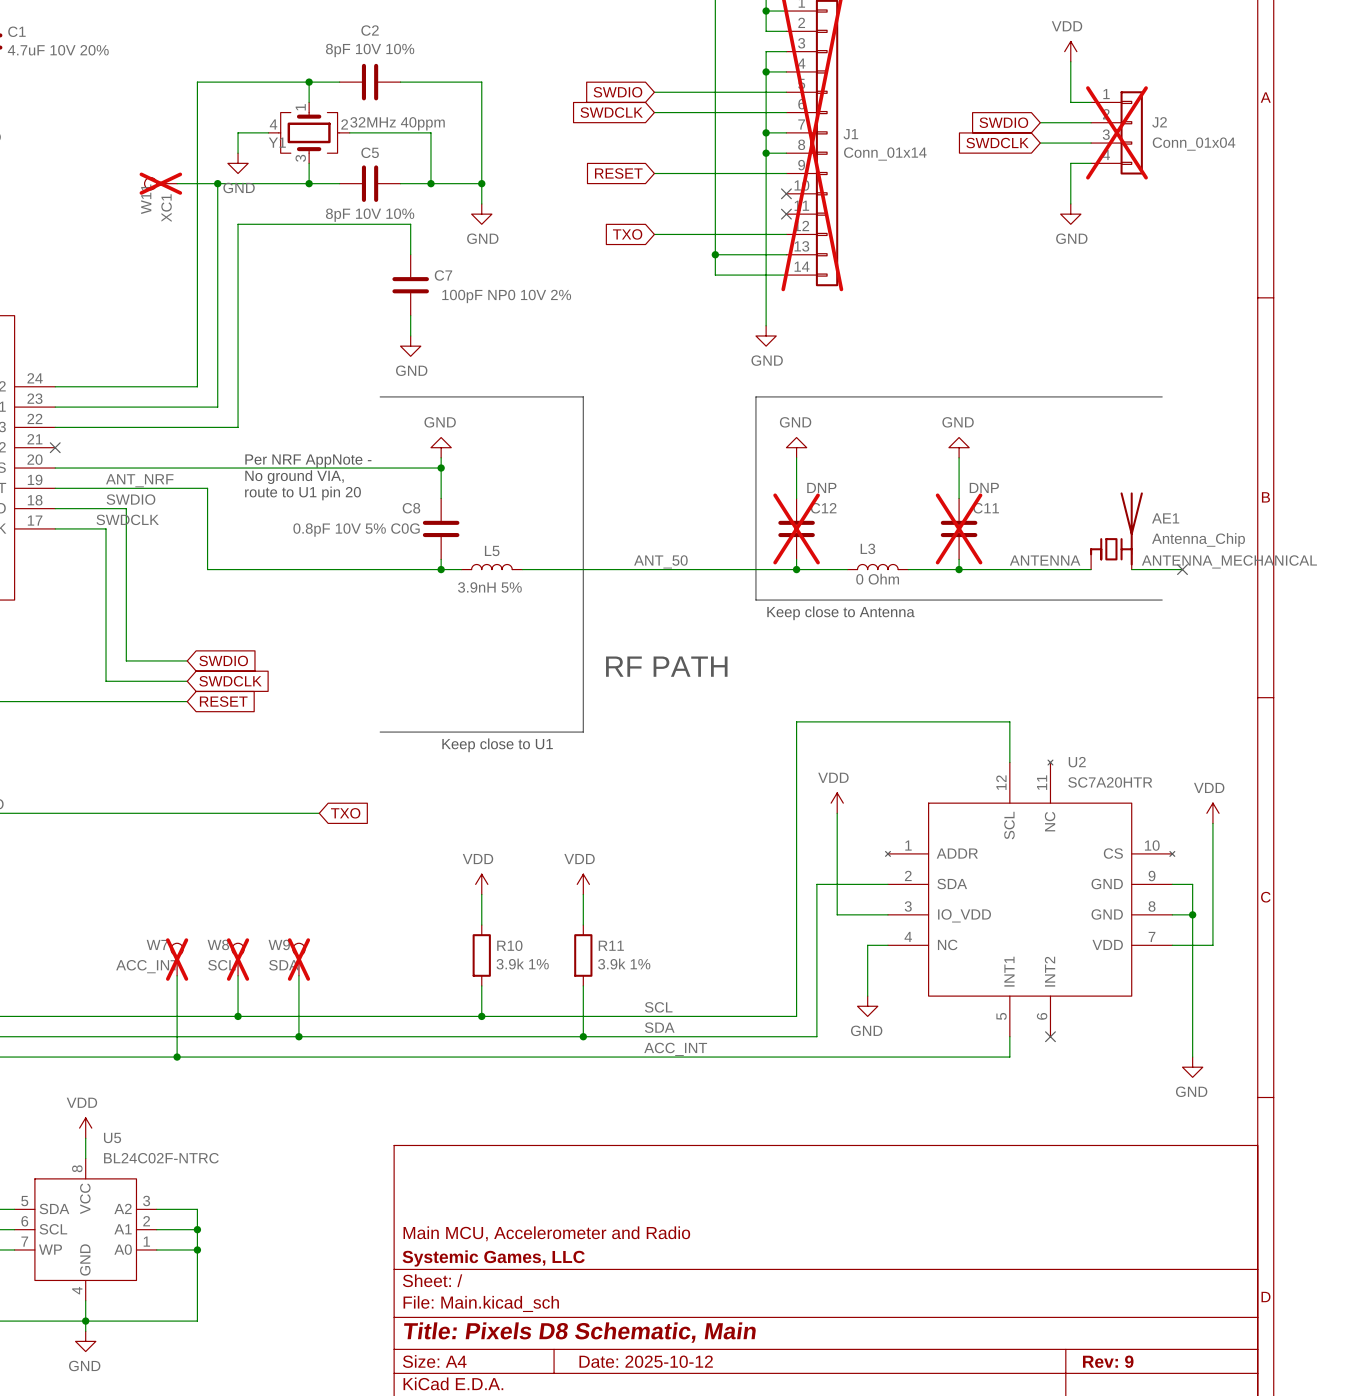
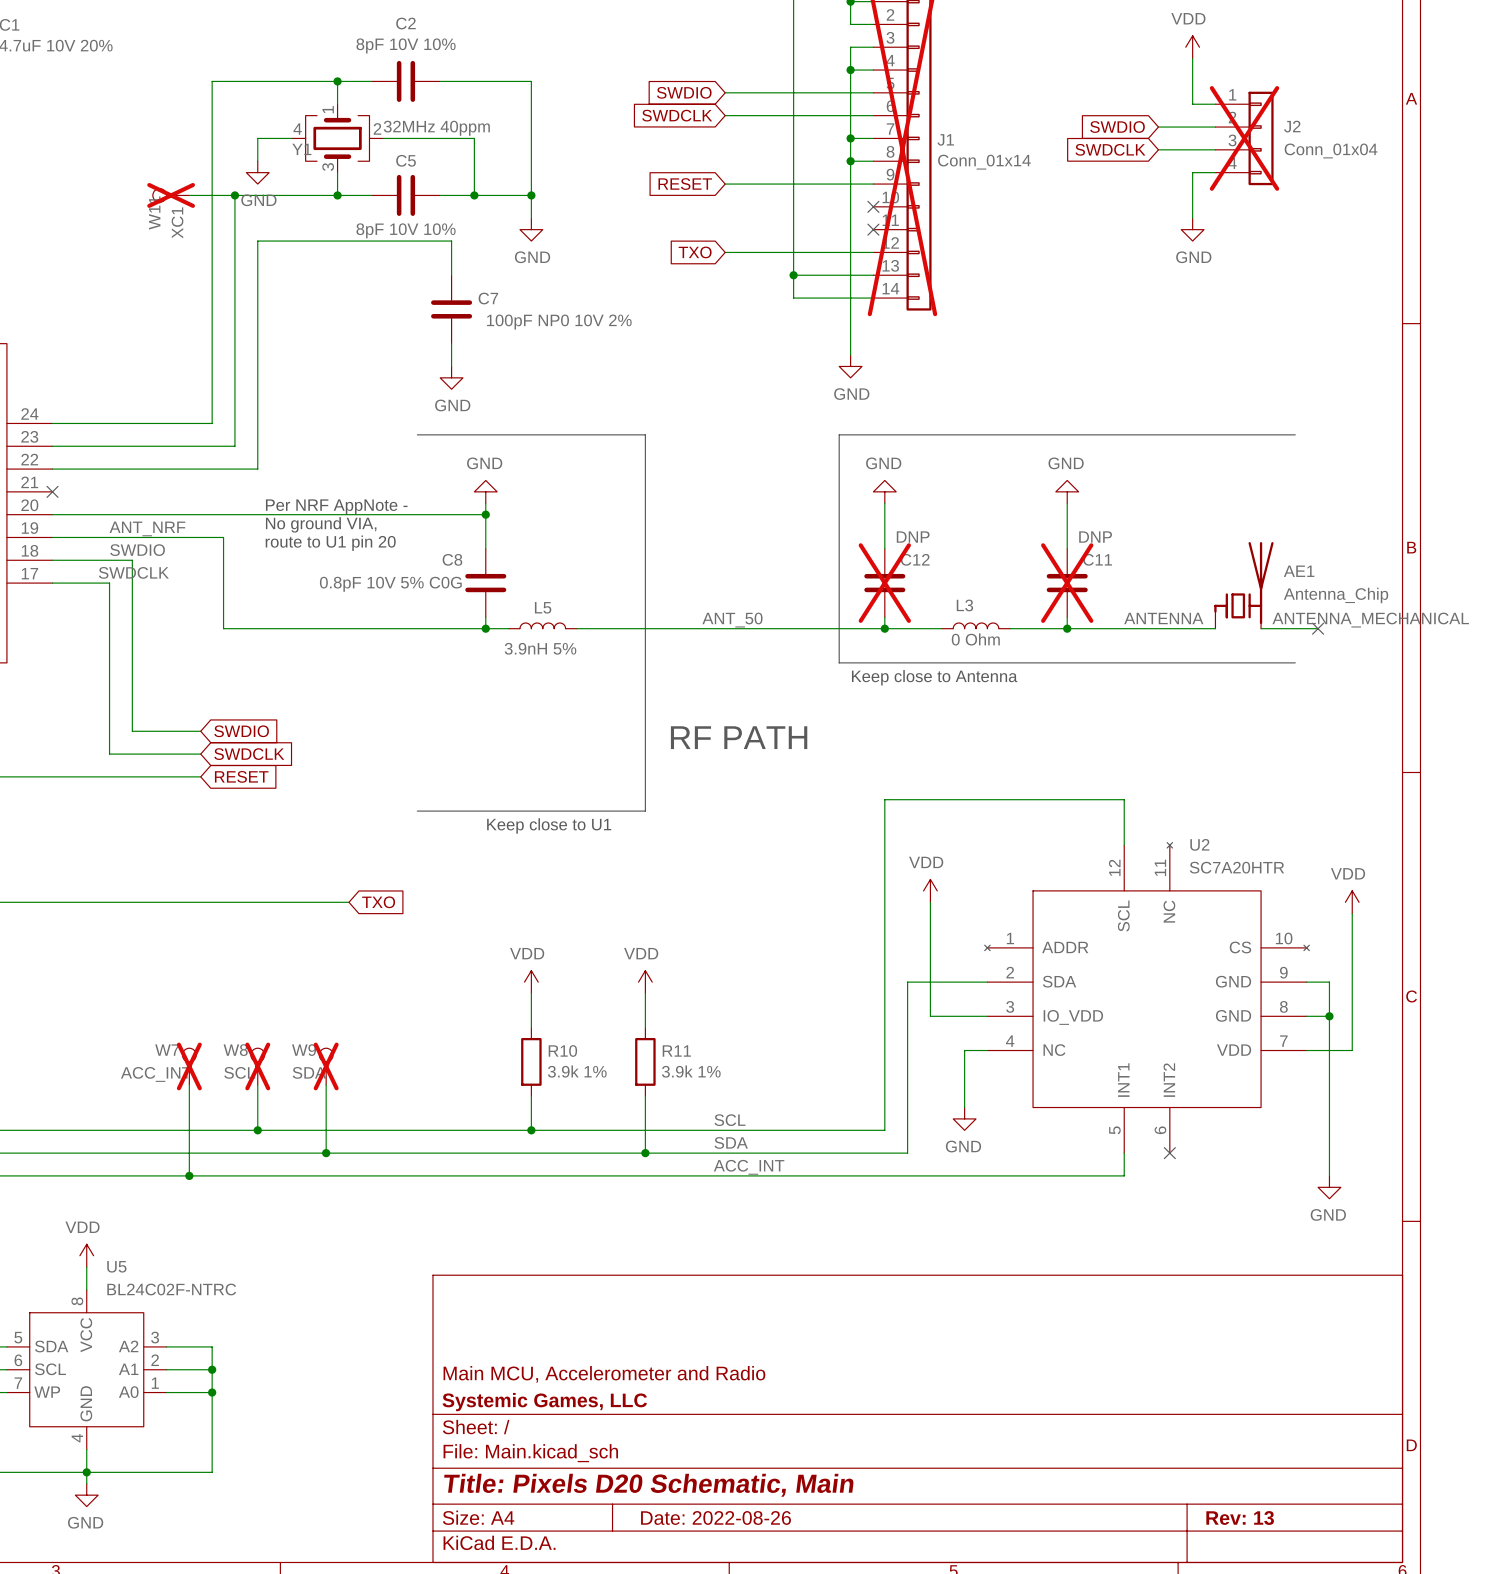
title block: Title: Pixels D8 Schematic, Main (579, 1332) -> Title: Pixels D20 Schematic, Main (648, 1485)
title block: Date: 2025-10-12 (646, 1361) -> Date: 2022-08-26 (716, 1517)
title block: Rev: 9 (1108, 1361) -> Rev: 13 (1240, 1518)

